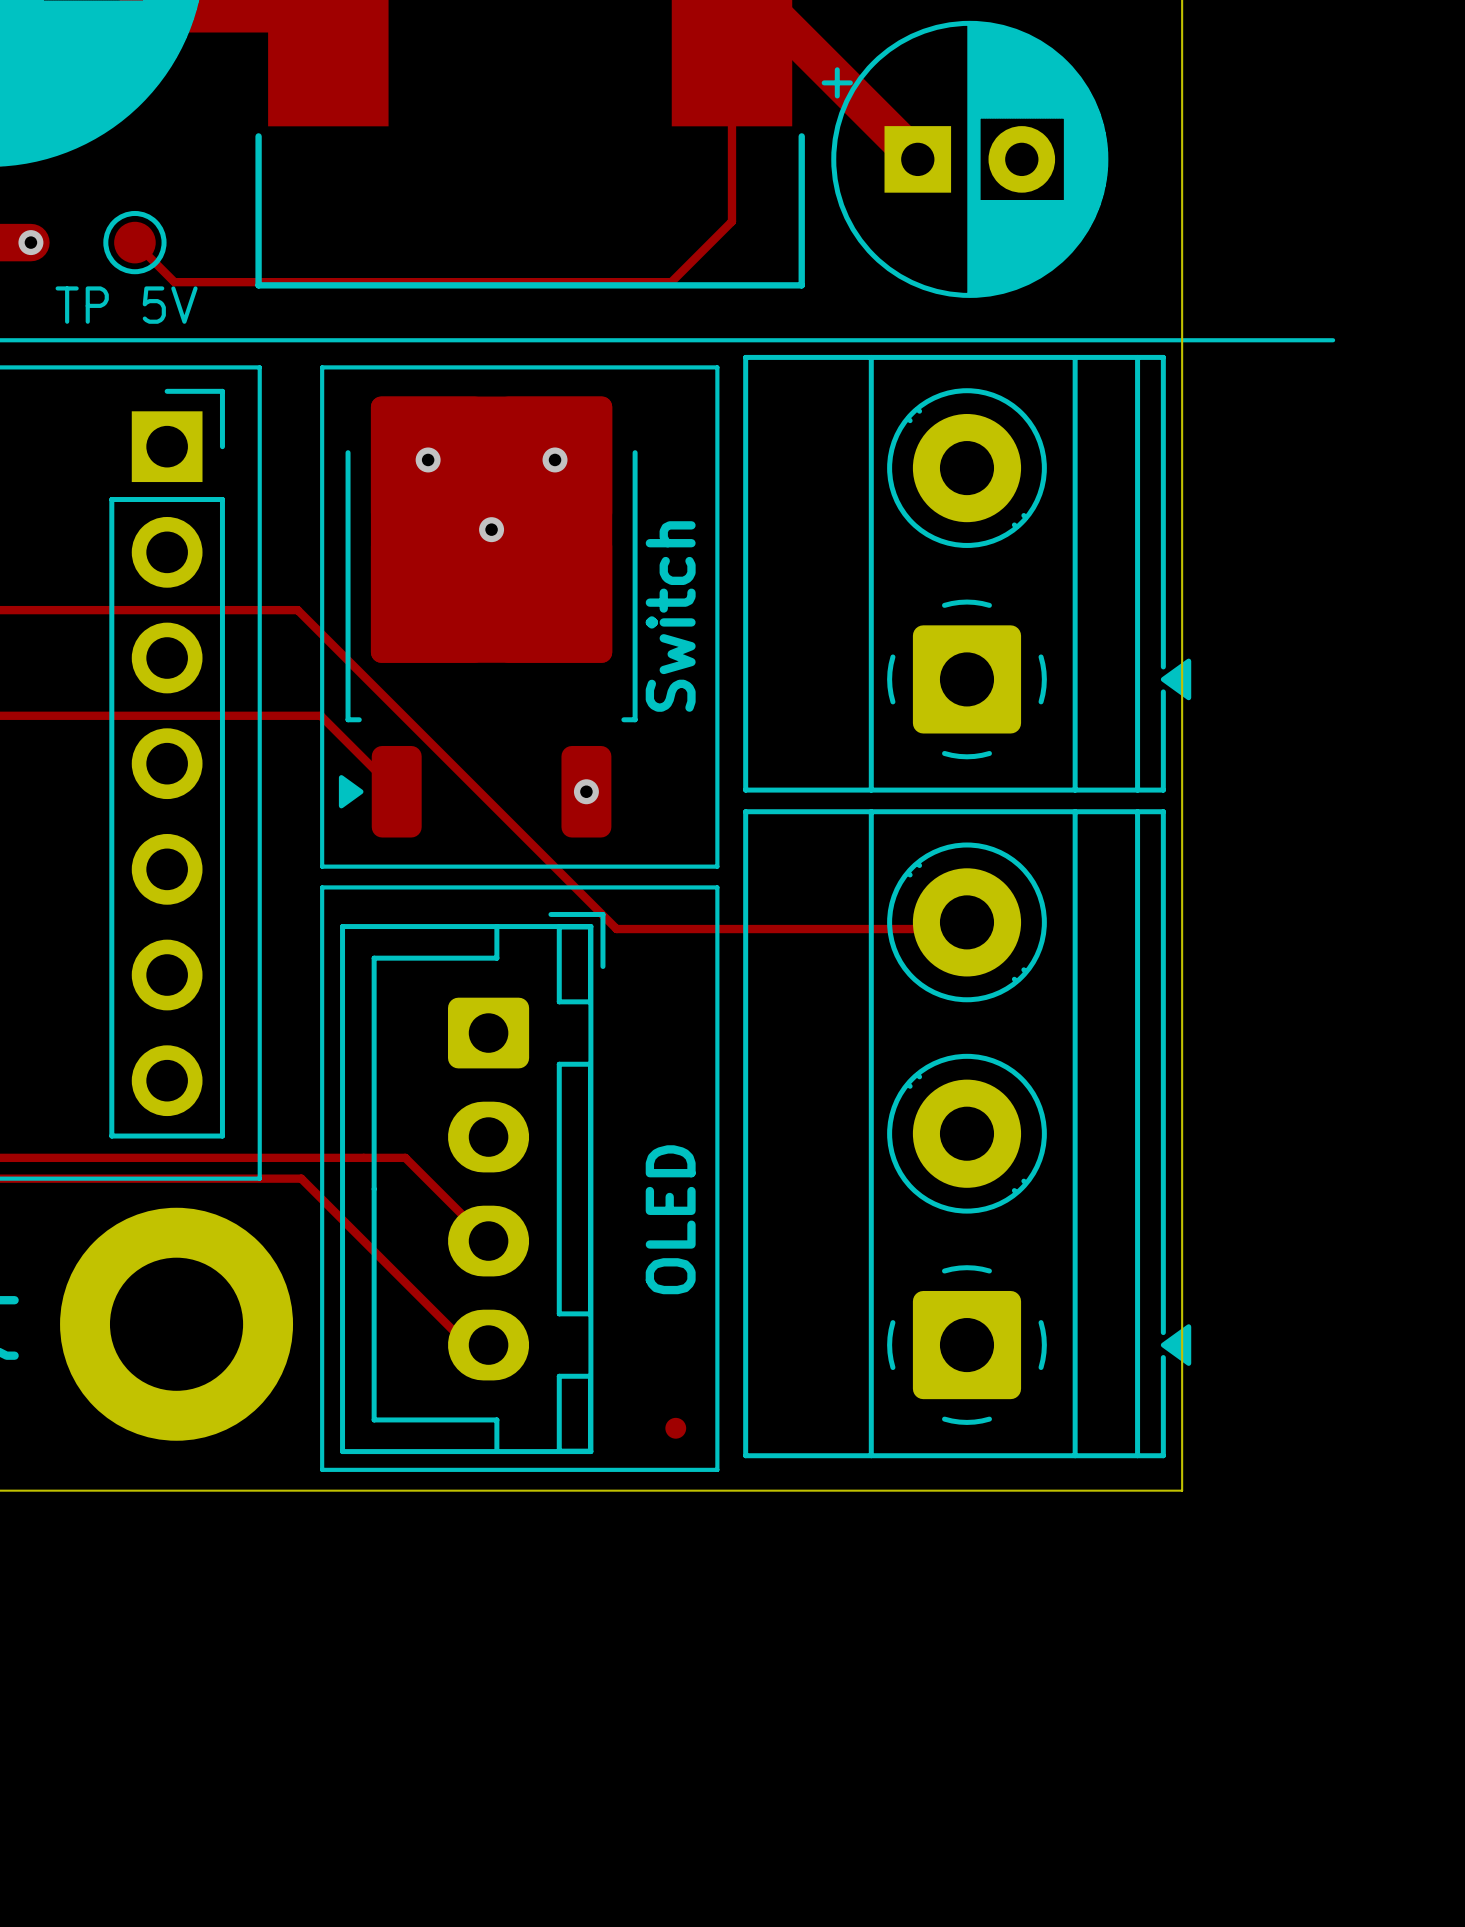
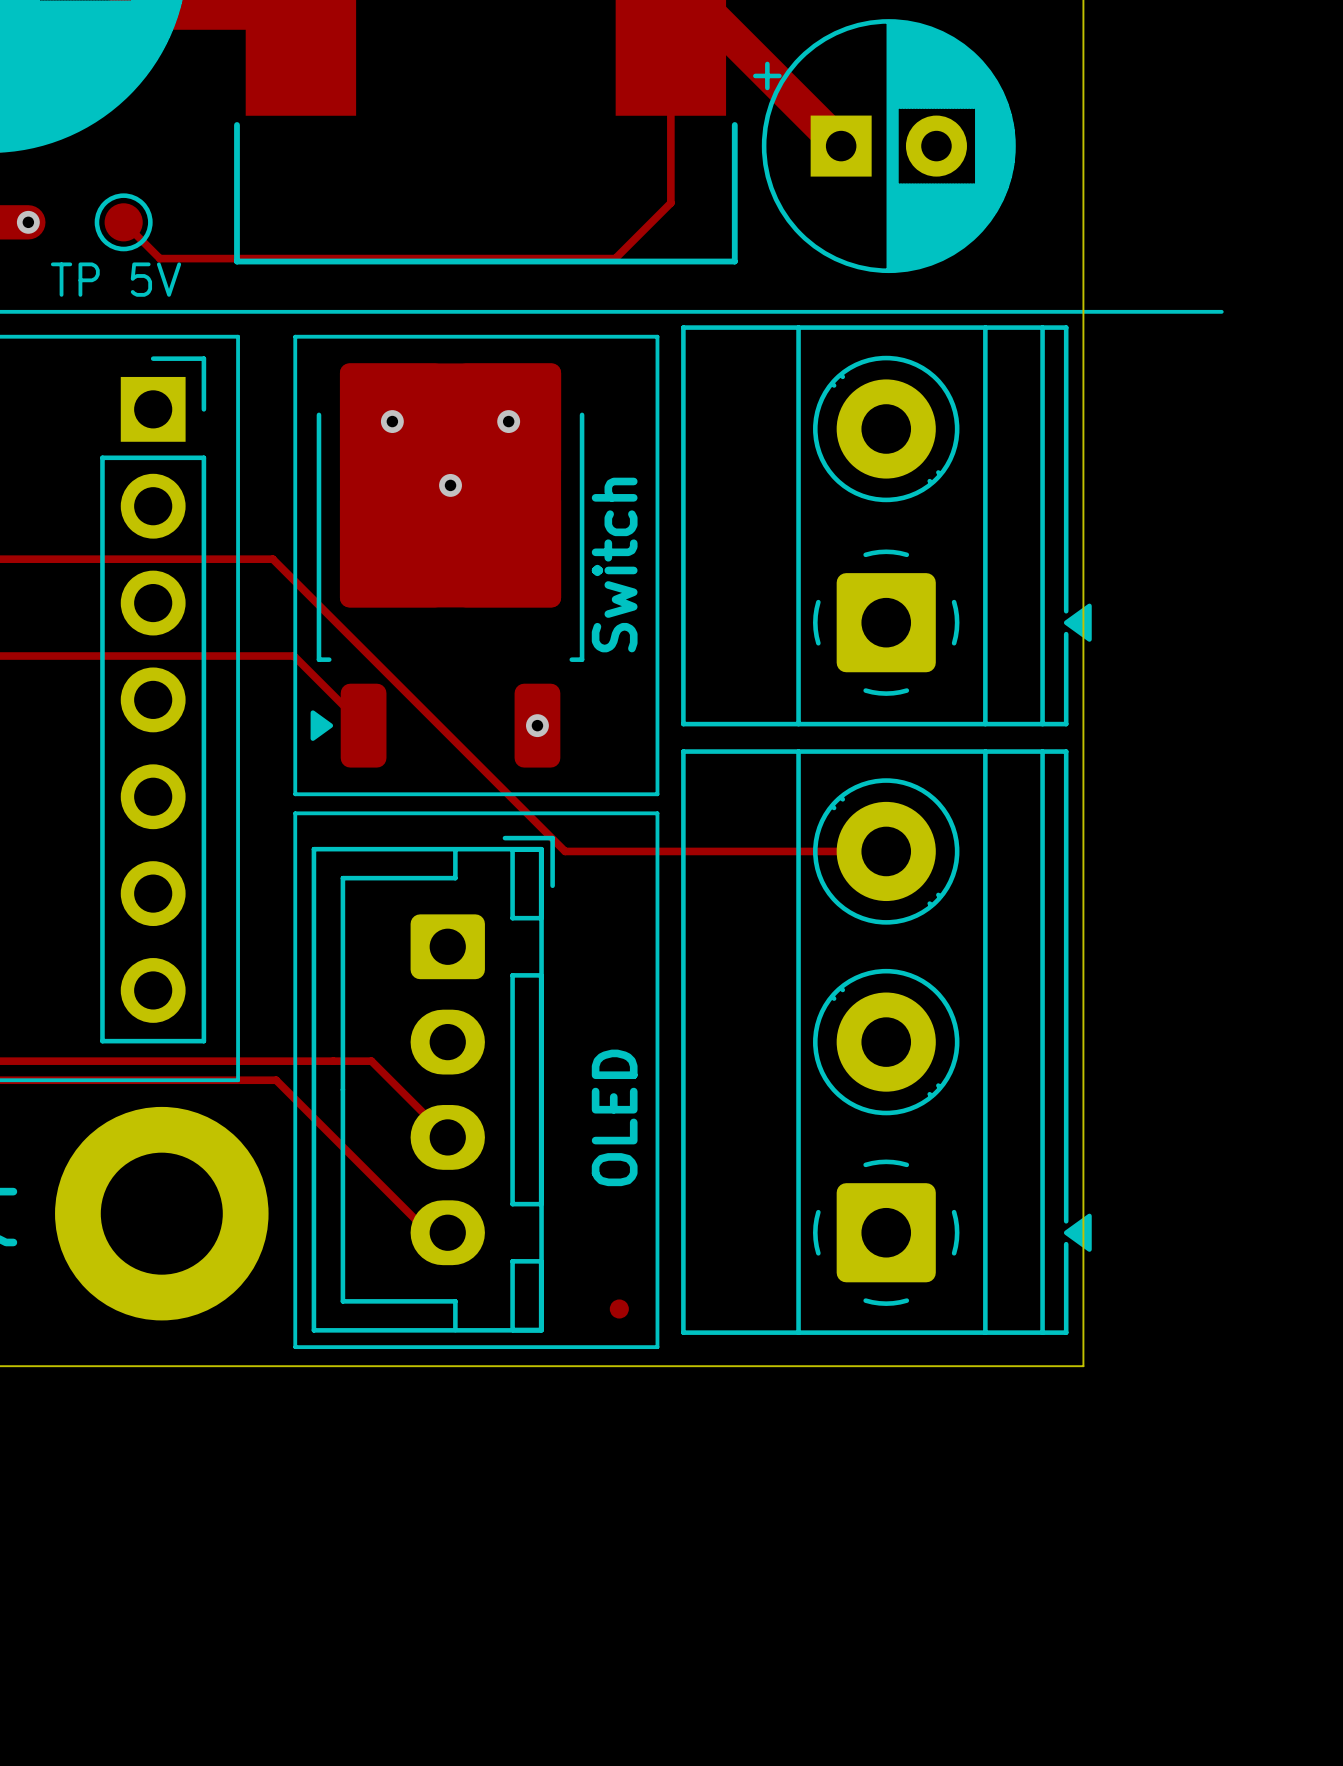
part footprint: [743, 809, 1192, 1459] -> [681, 749, 1092, 1335]

